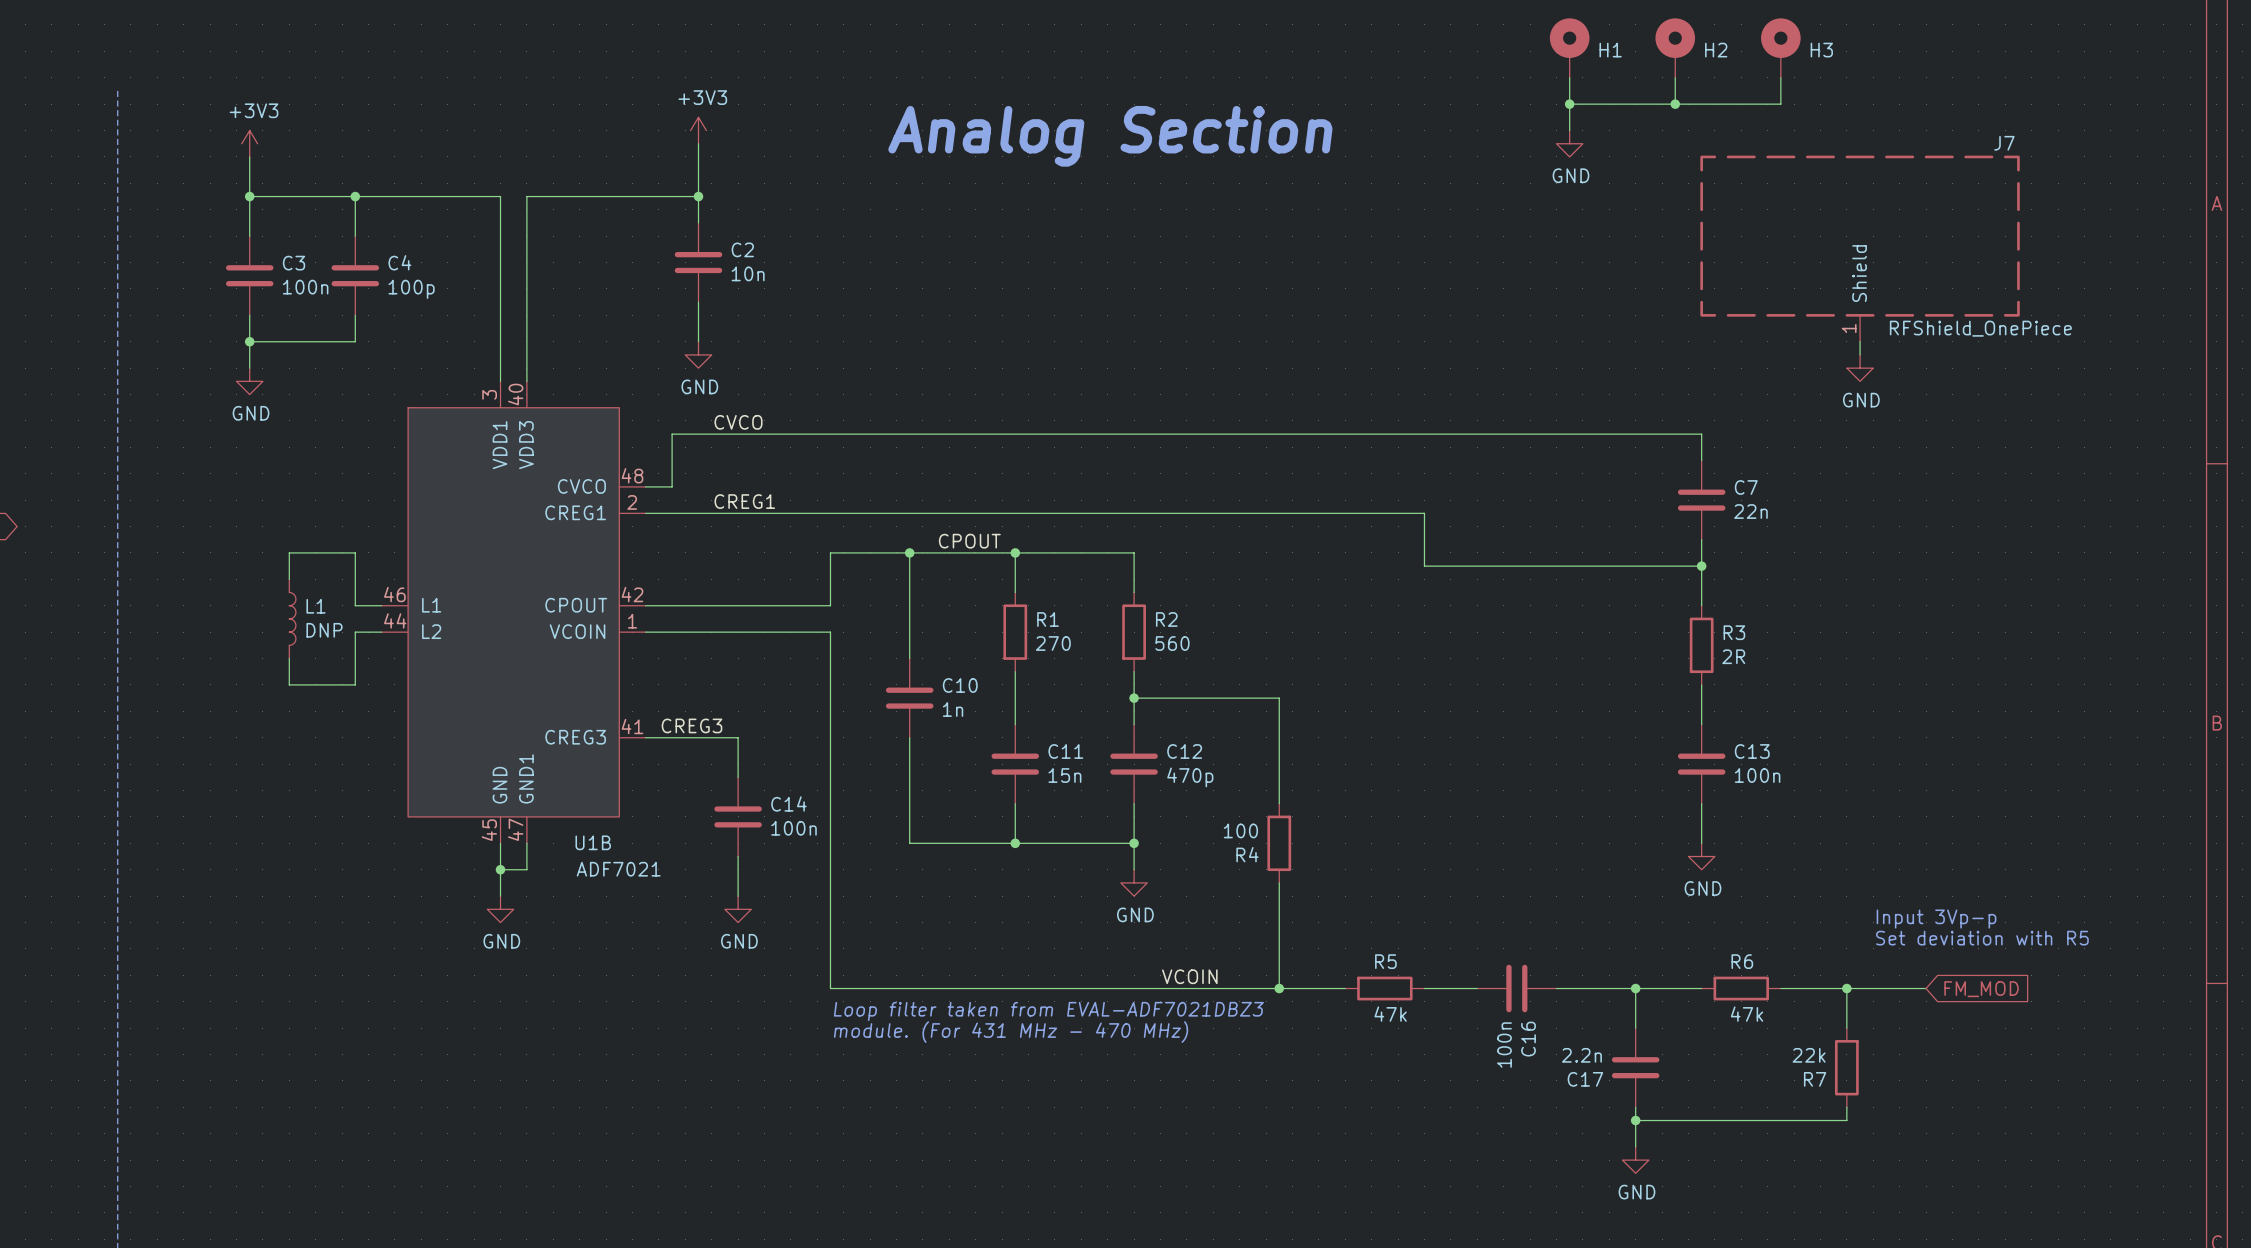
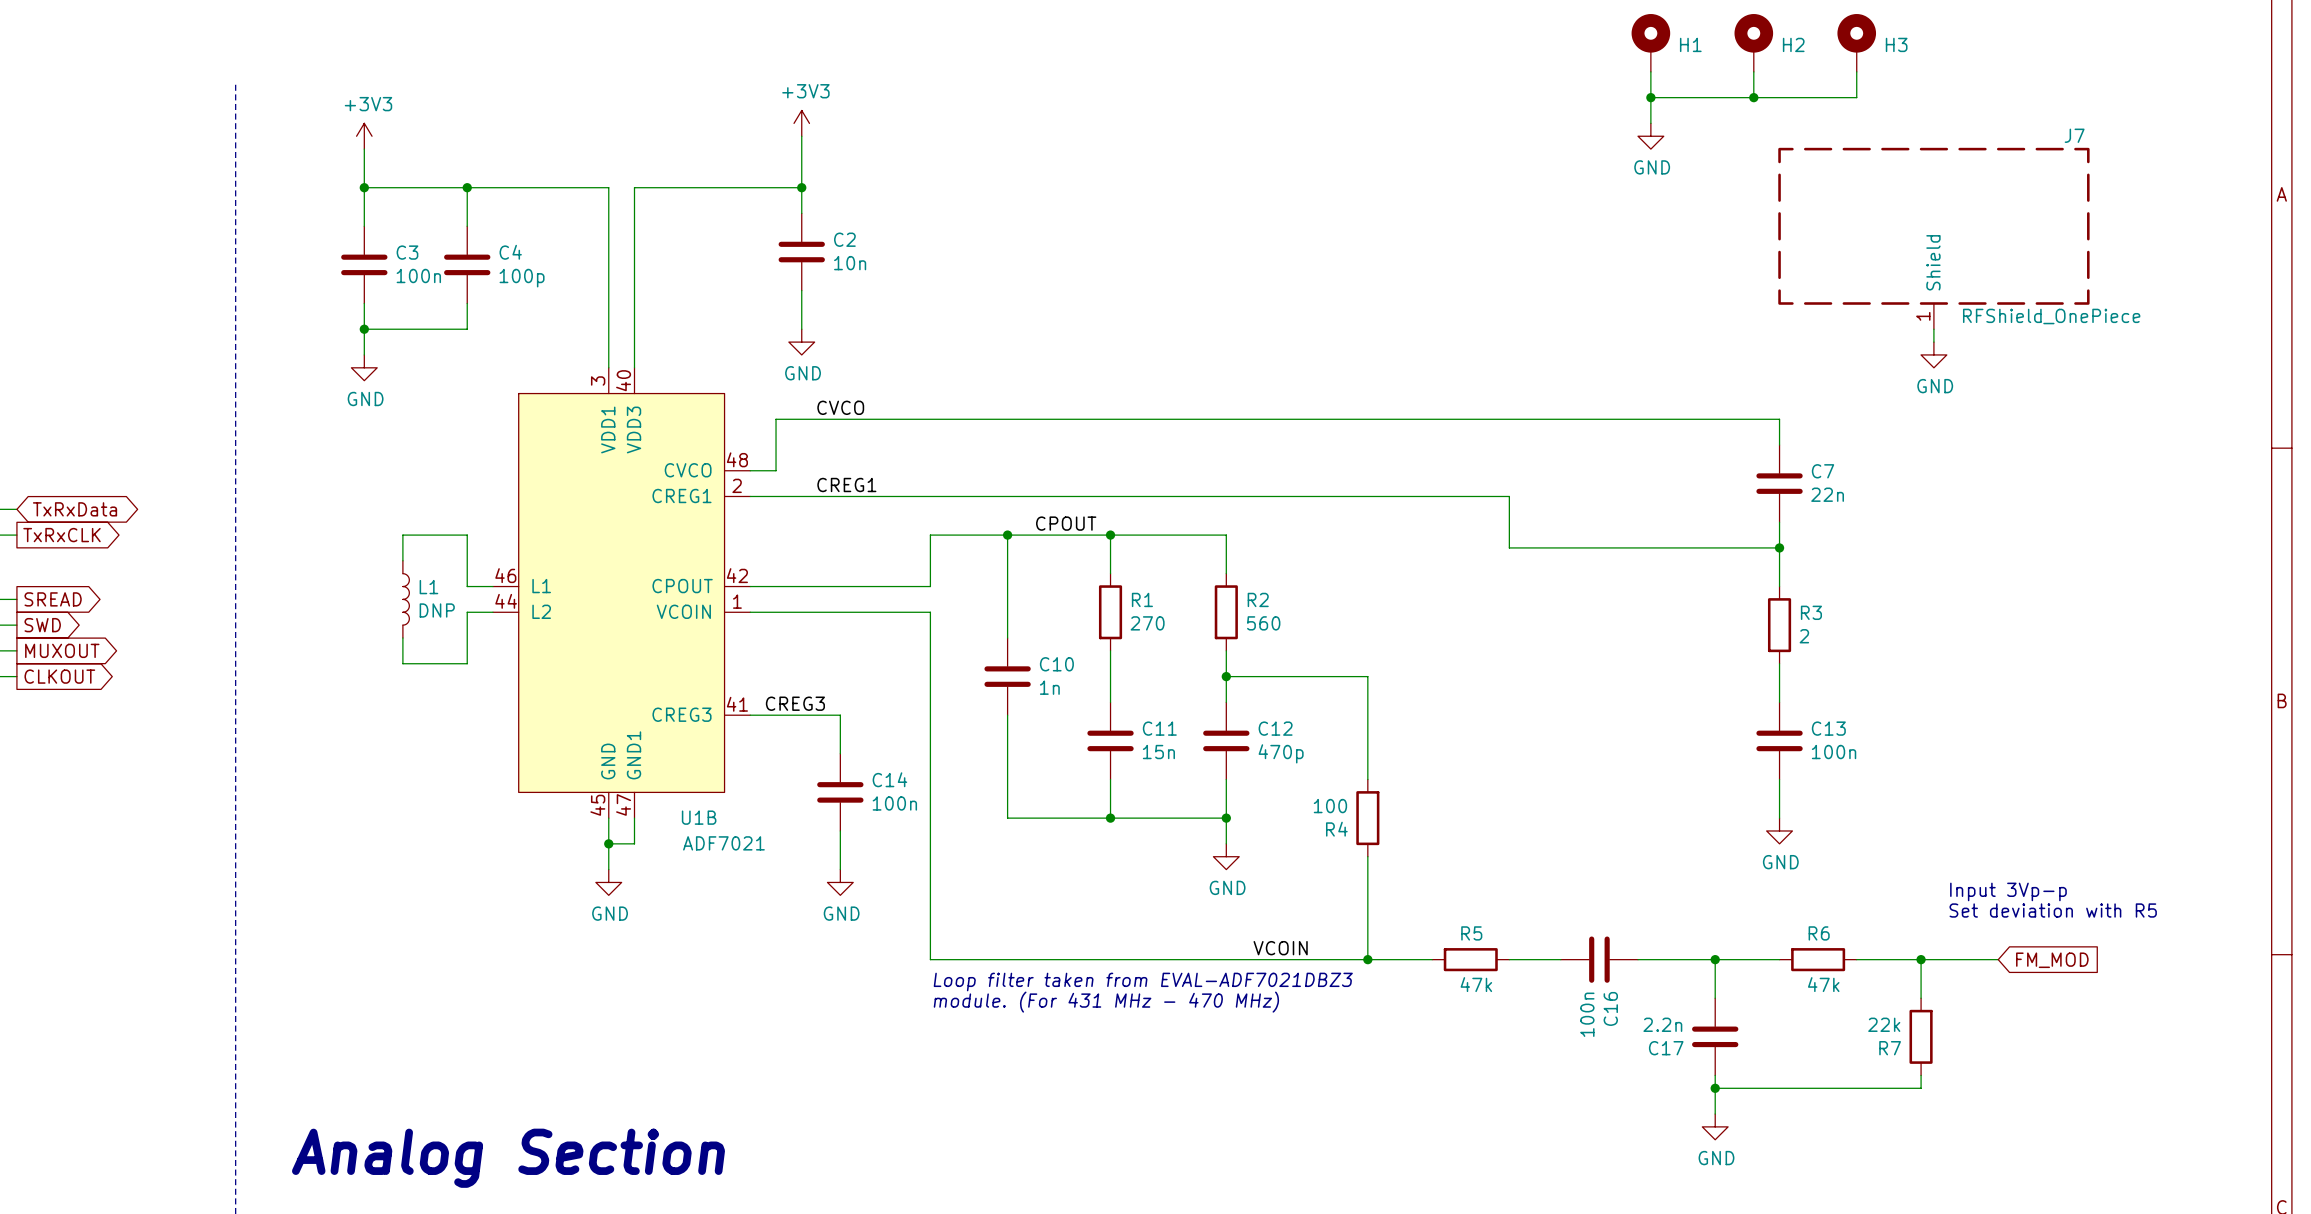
text: Analog Section (1110, 136) -> none
R3 value: 2R (1733, 656) -> 2 (1804, 636)
text: none -> Analog Section (508, 1158)

